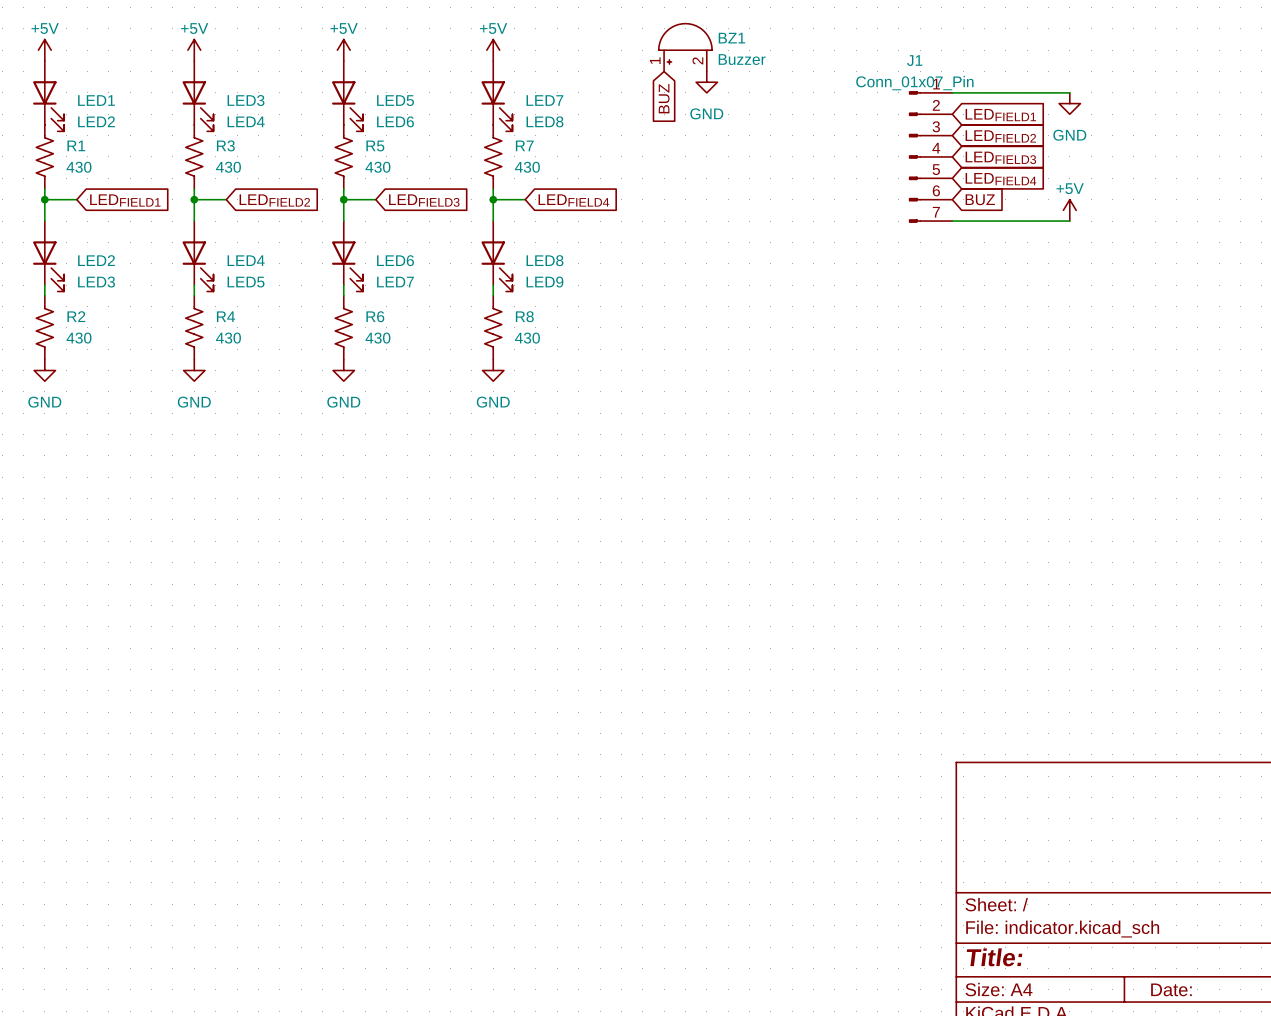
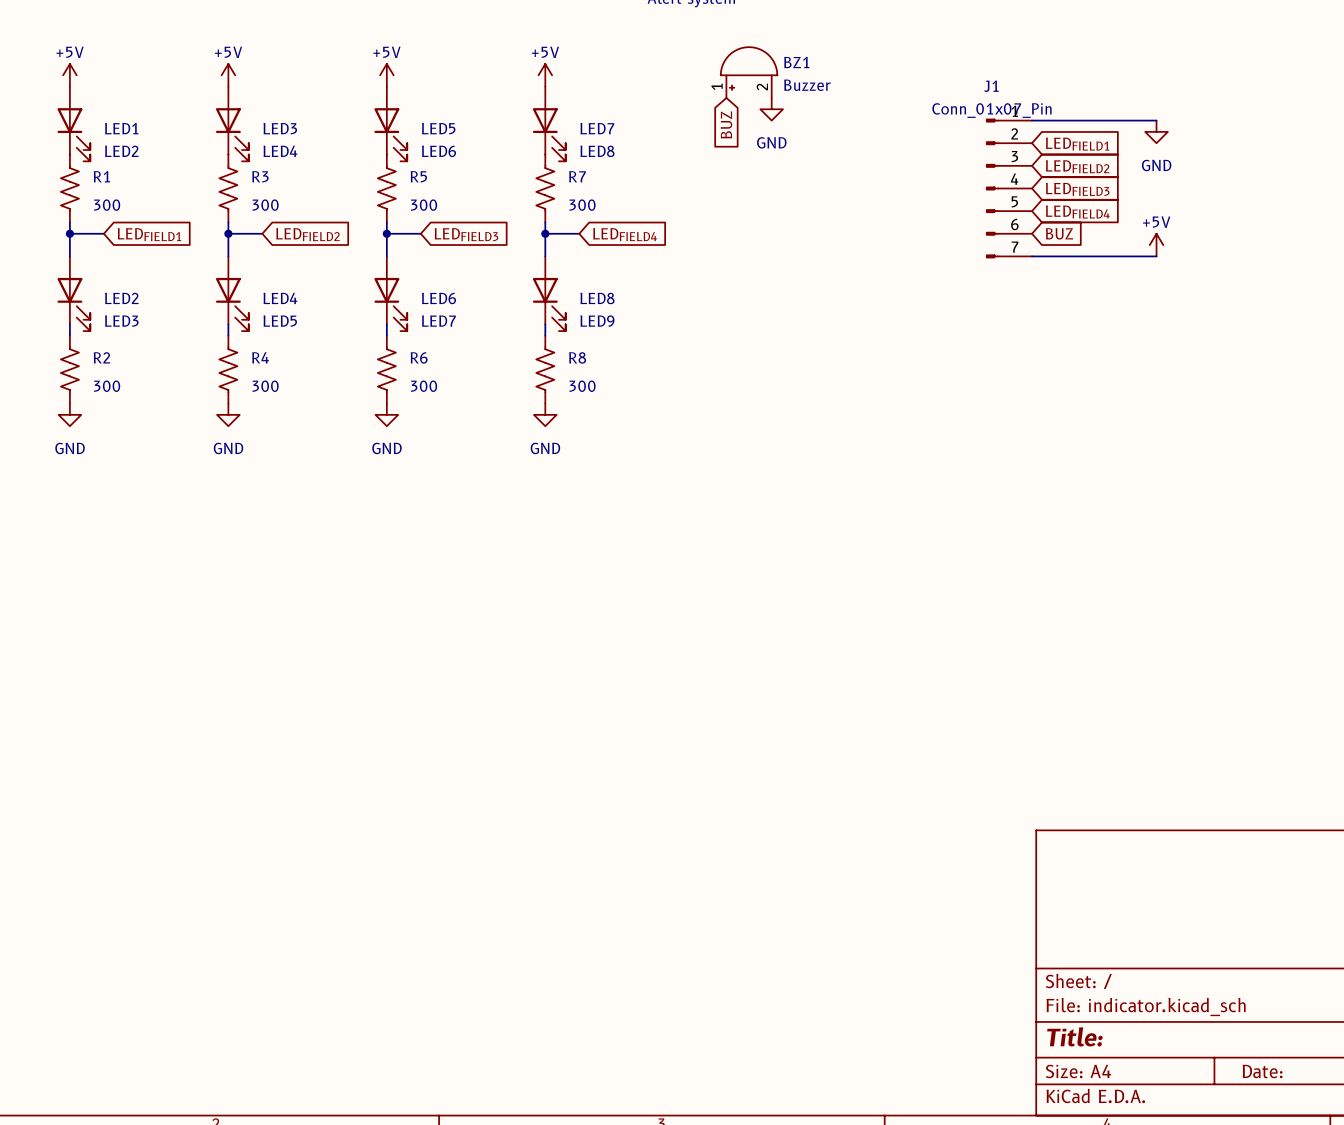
R1 value: 430 (79, 167) -> 300 (107, 205)
R3 value: 430 (228, 167) -> 300 (265, 205)
R5 value: 430 (377, 167) -> 300 (424, 205)
R7 value: 430 (527, 167) -> 300 (582, 205)
R2 value: 430 (79, 338) -> 300 (107, 386)
R4 value: 430 (228, 338) -> 300 (265, 386)
R6 value: 430 (377, 338) -> 300 (424, 386)
R8 value: 430 (527, 338) -> 300 (582, 386)

